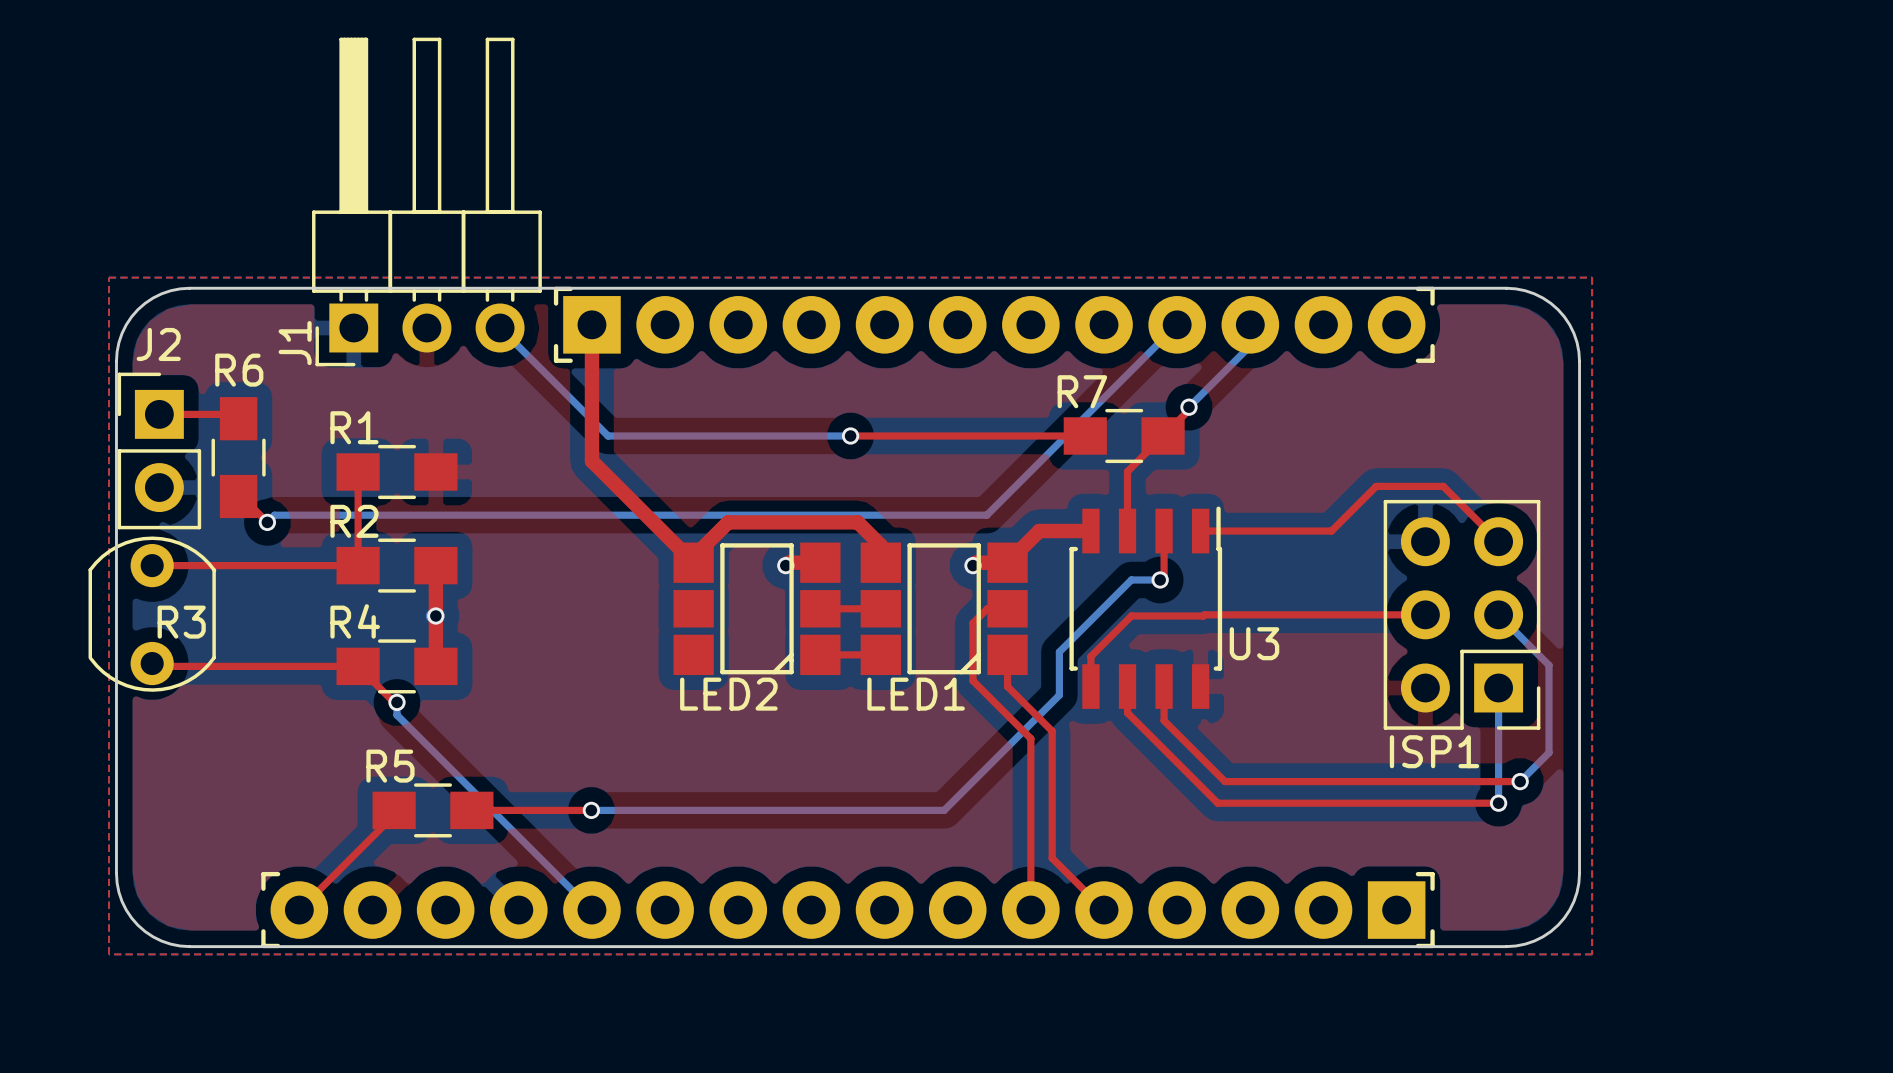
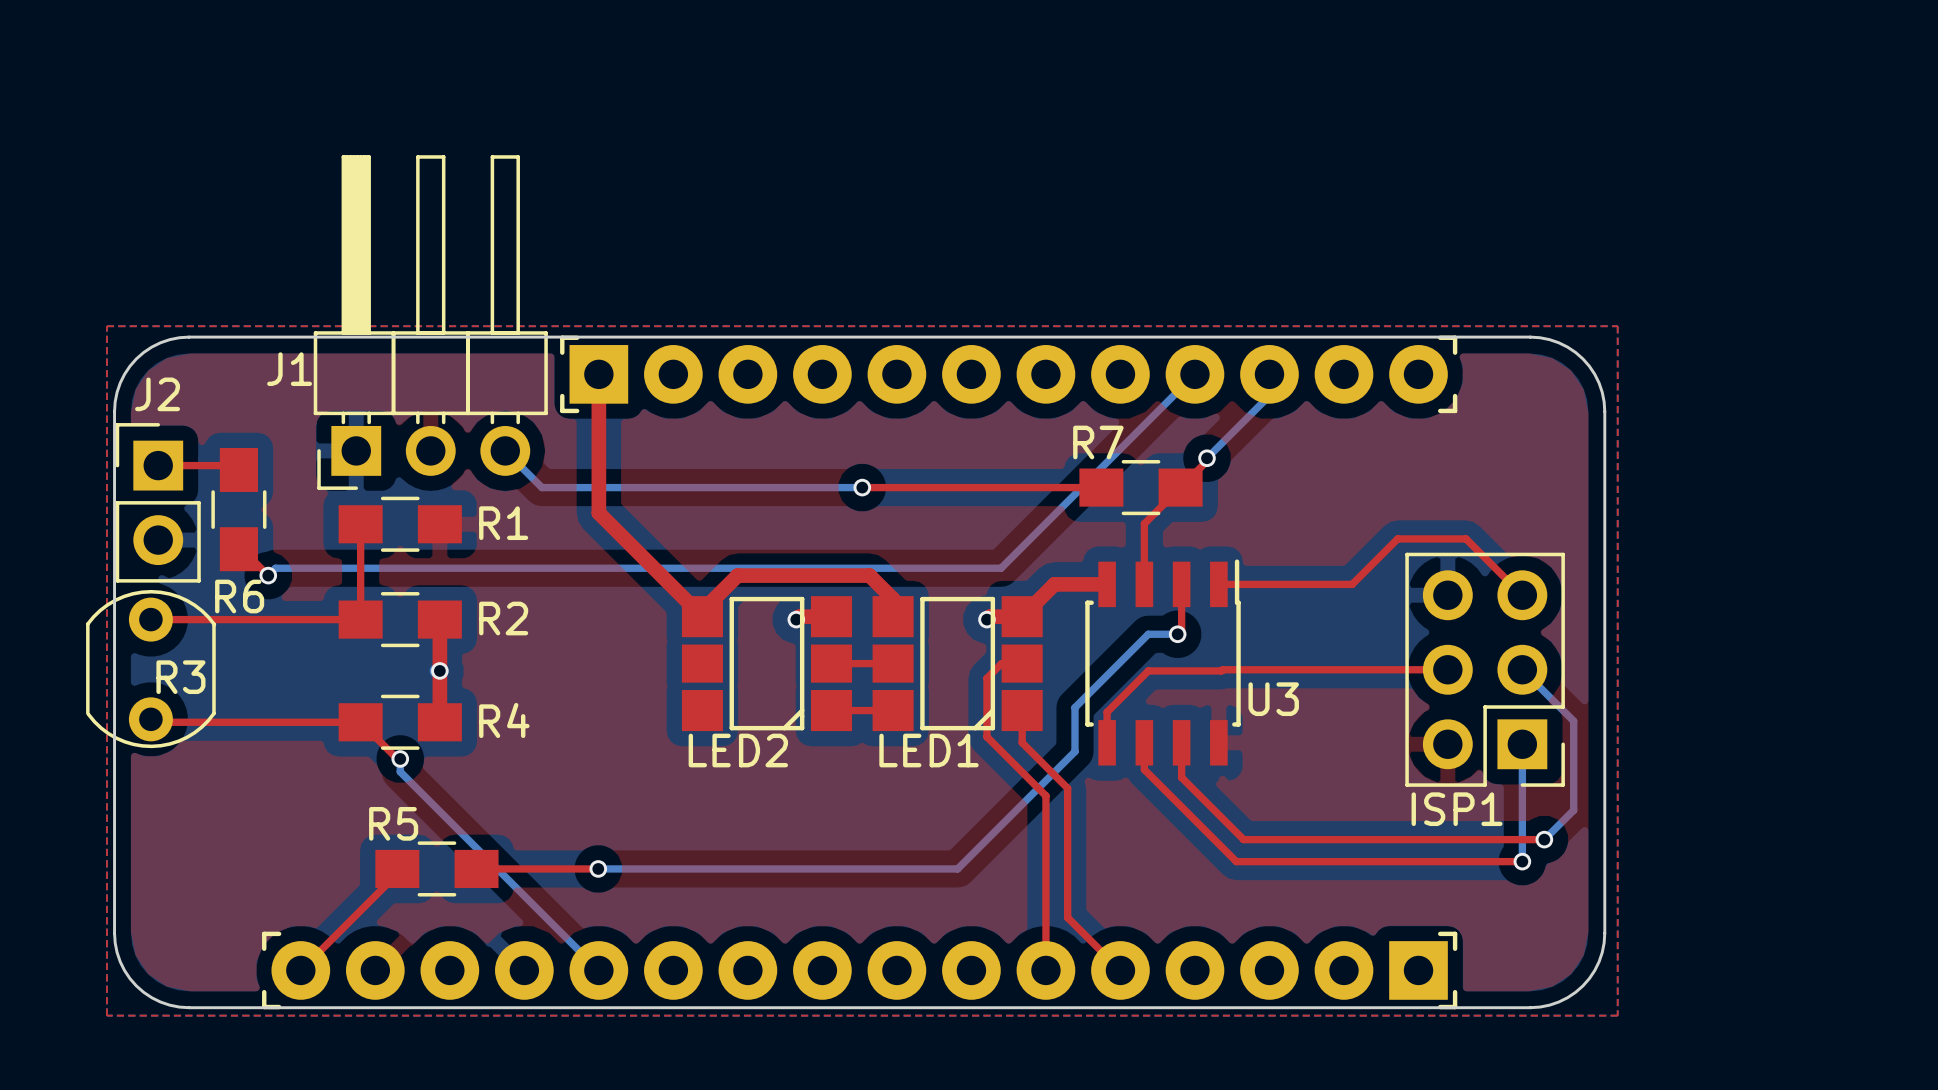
J1 position: (426, 201) -> (430, 322)
bottom track: (500, 327) (608, 435) -> (505, 450) (541, 487) (615, 487)
J1 name rotation: 0° (295, 343) -> 90° clockwise (289, 369)
R6 name position: R6 (239, 370) -> R6 (239, 596)
R1 name position: R1 (354, 427) -> R1 (503, 523)
R2 name position: R2 (354, 521) -> R2 (503, 618)
R4 name position: R4 (355, 621) -> R4 (504, 720)

